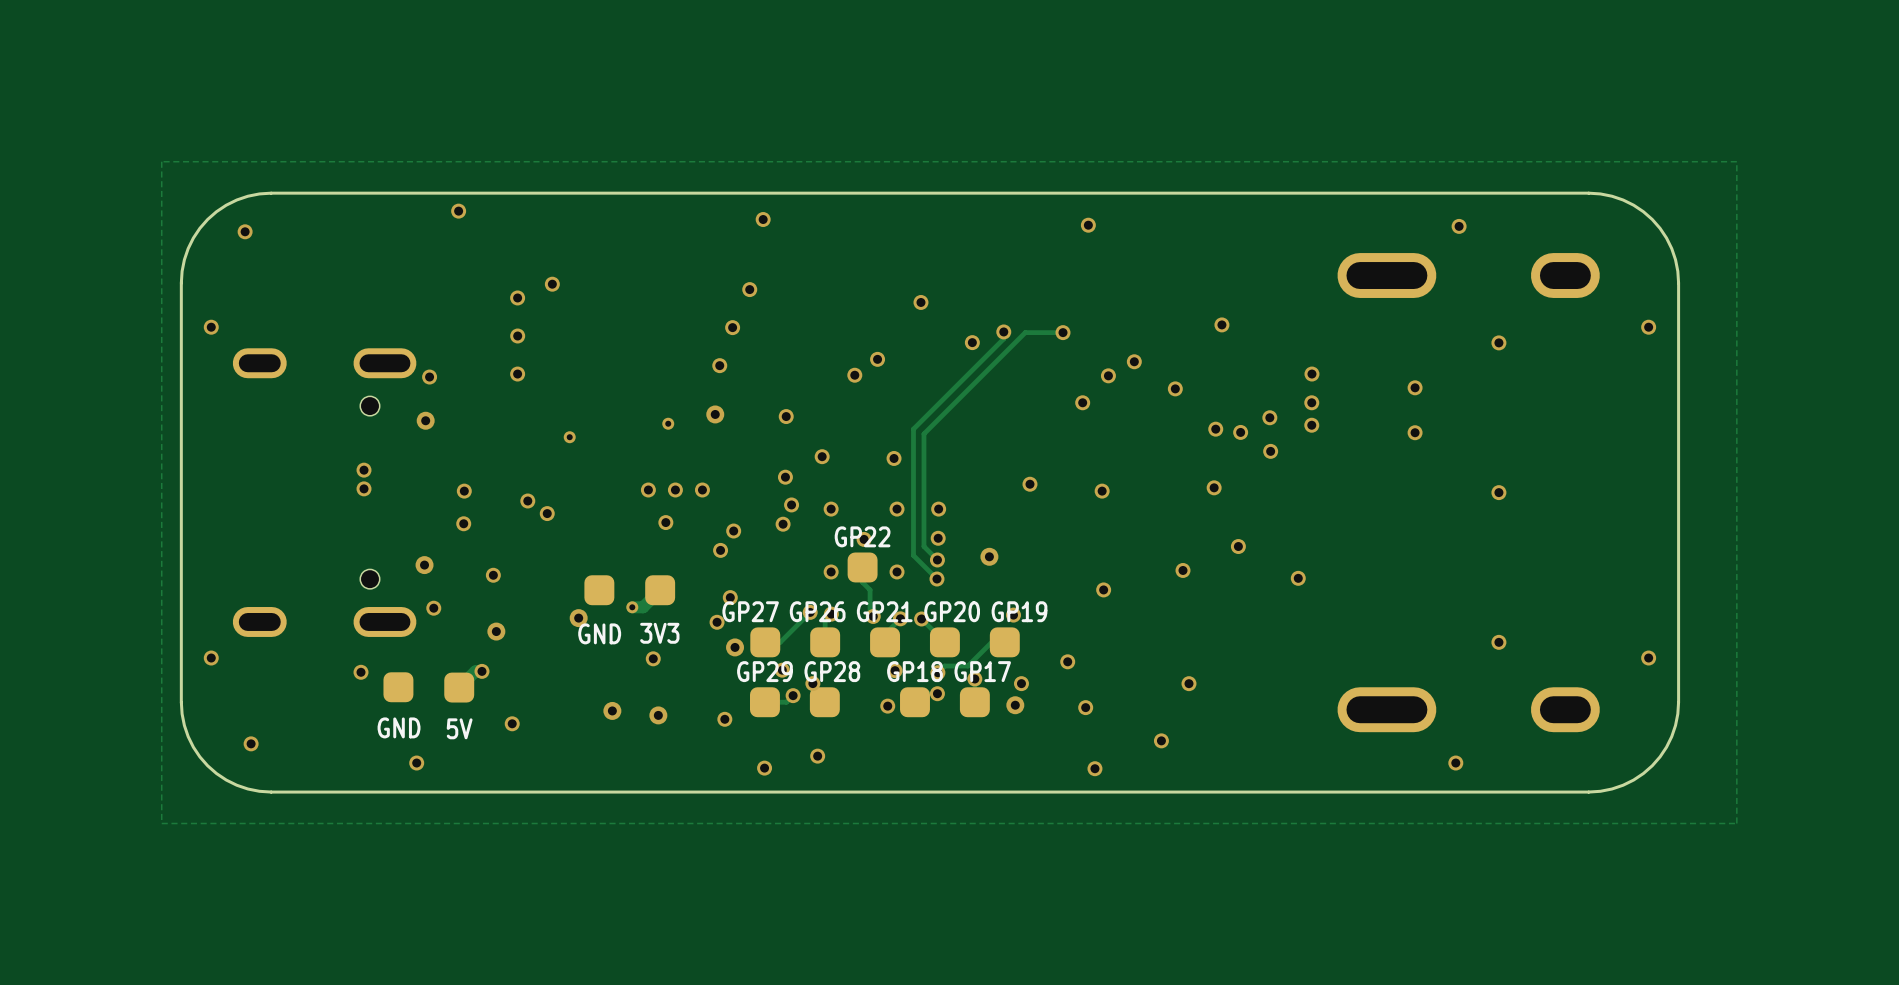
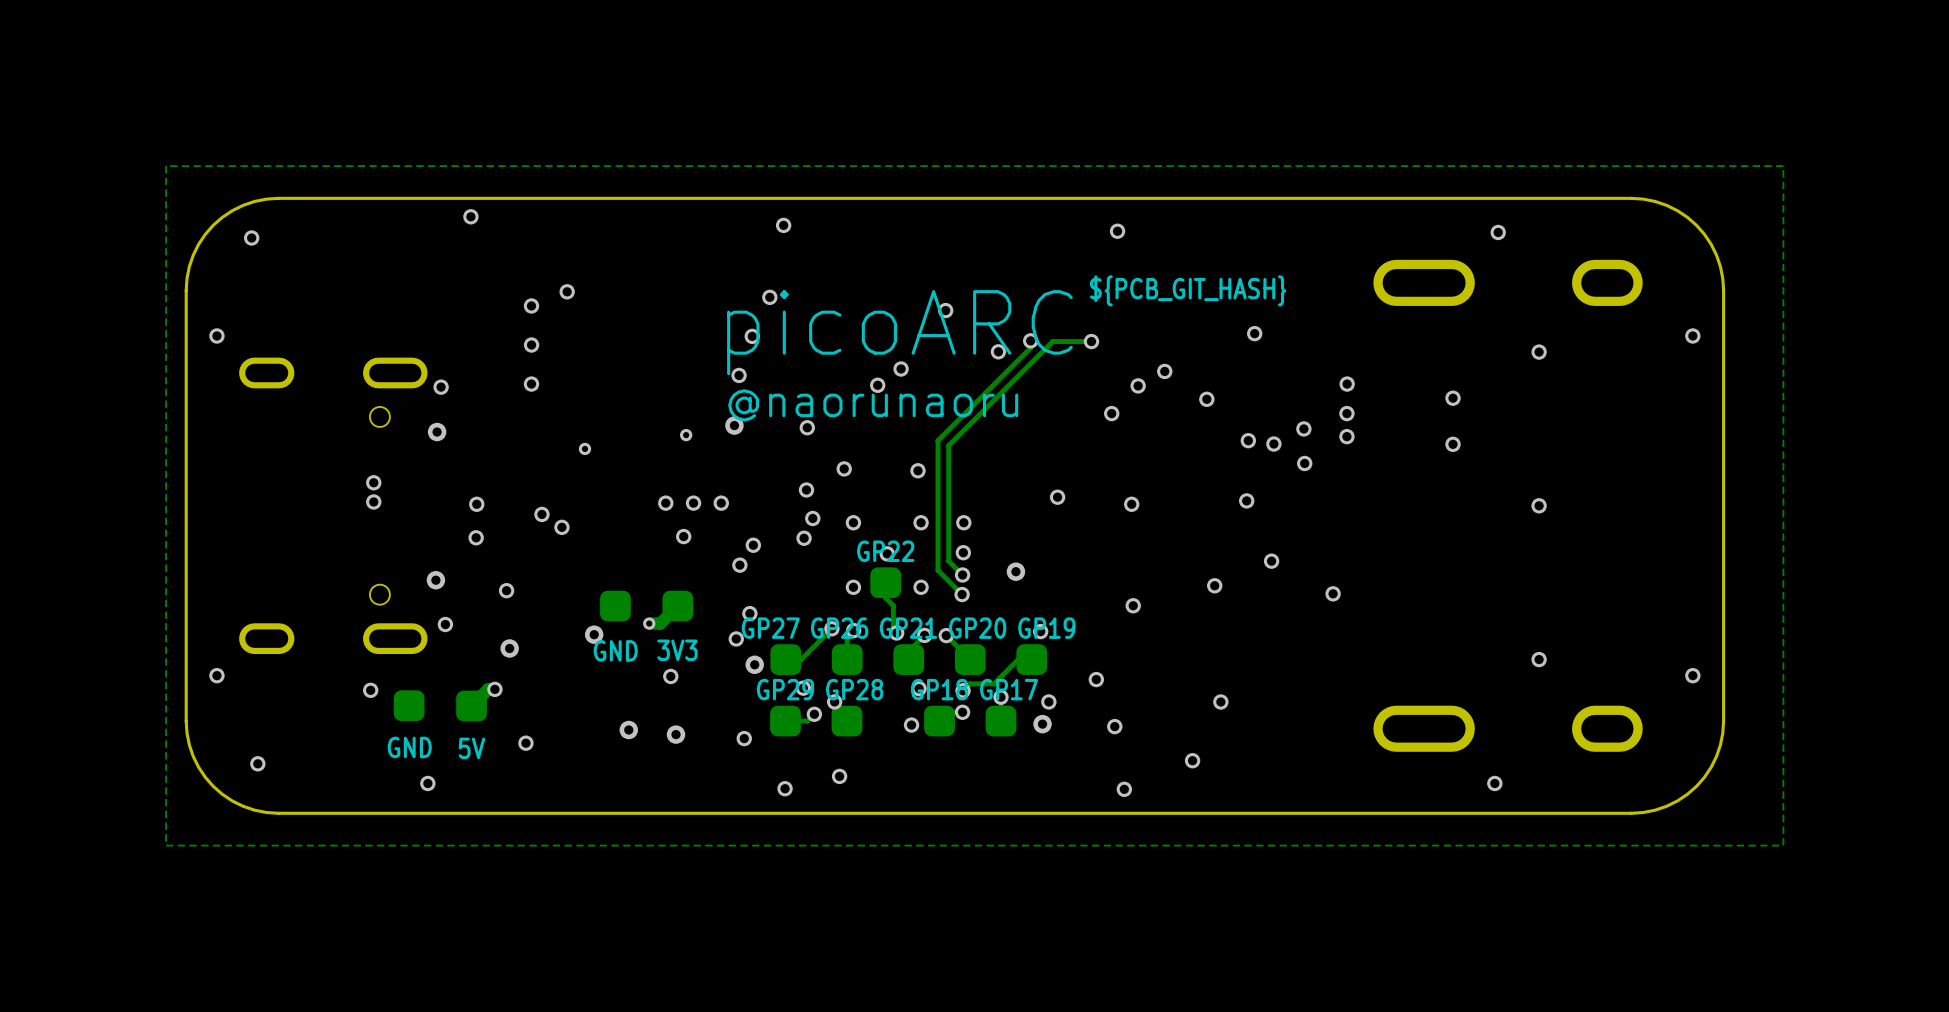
text: none -> ${PCB_GIT_HASH} (1188, 290)
text: none -> picoARC (899, 332)
text: none -> @naorunaoru (873, 405)

